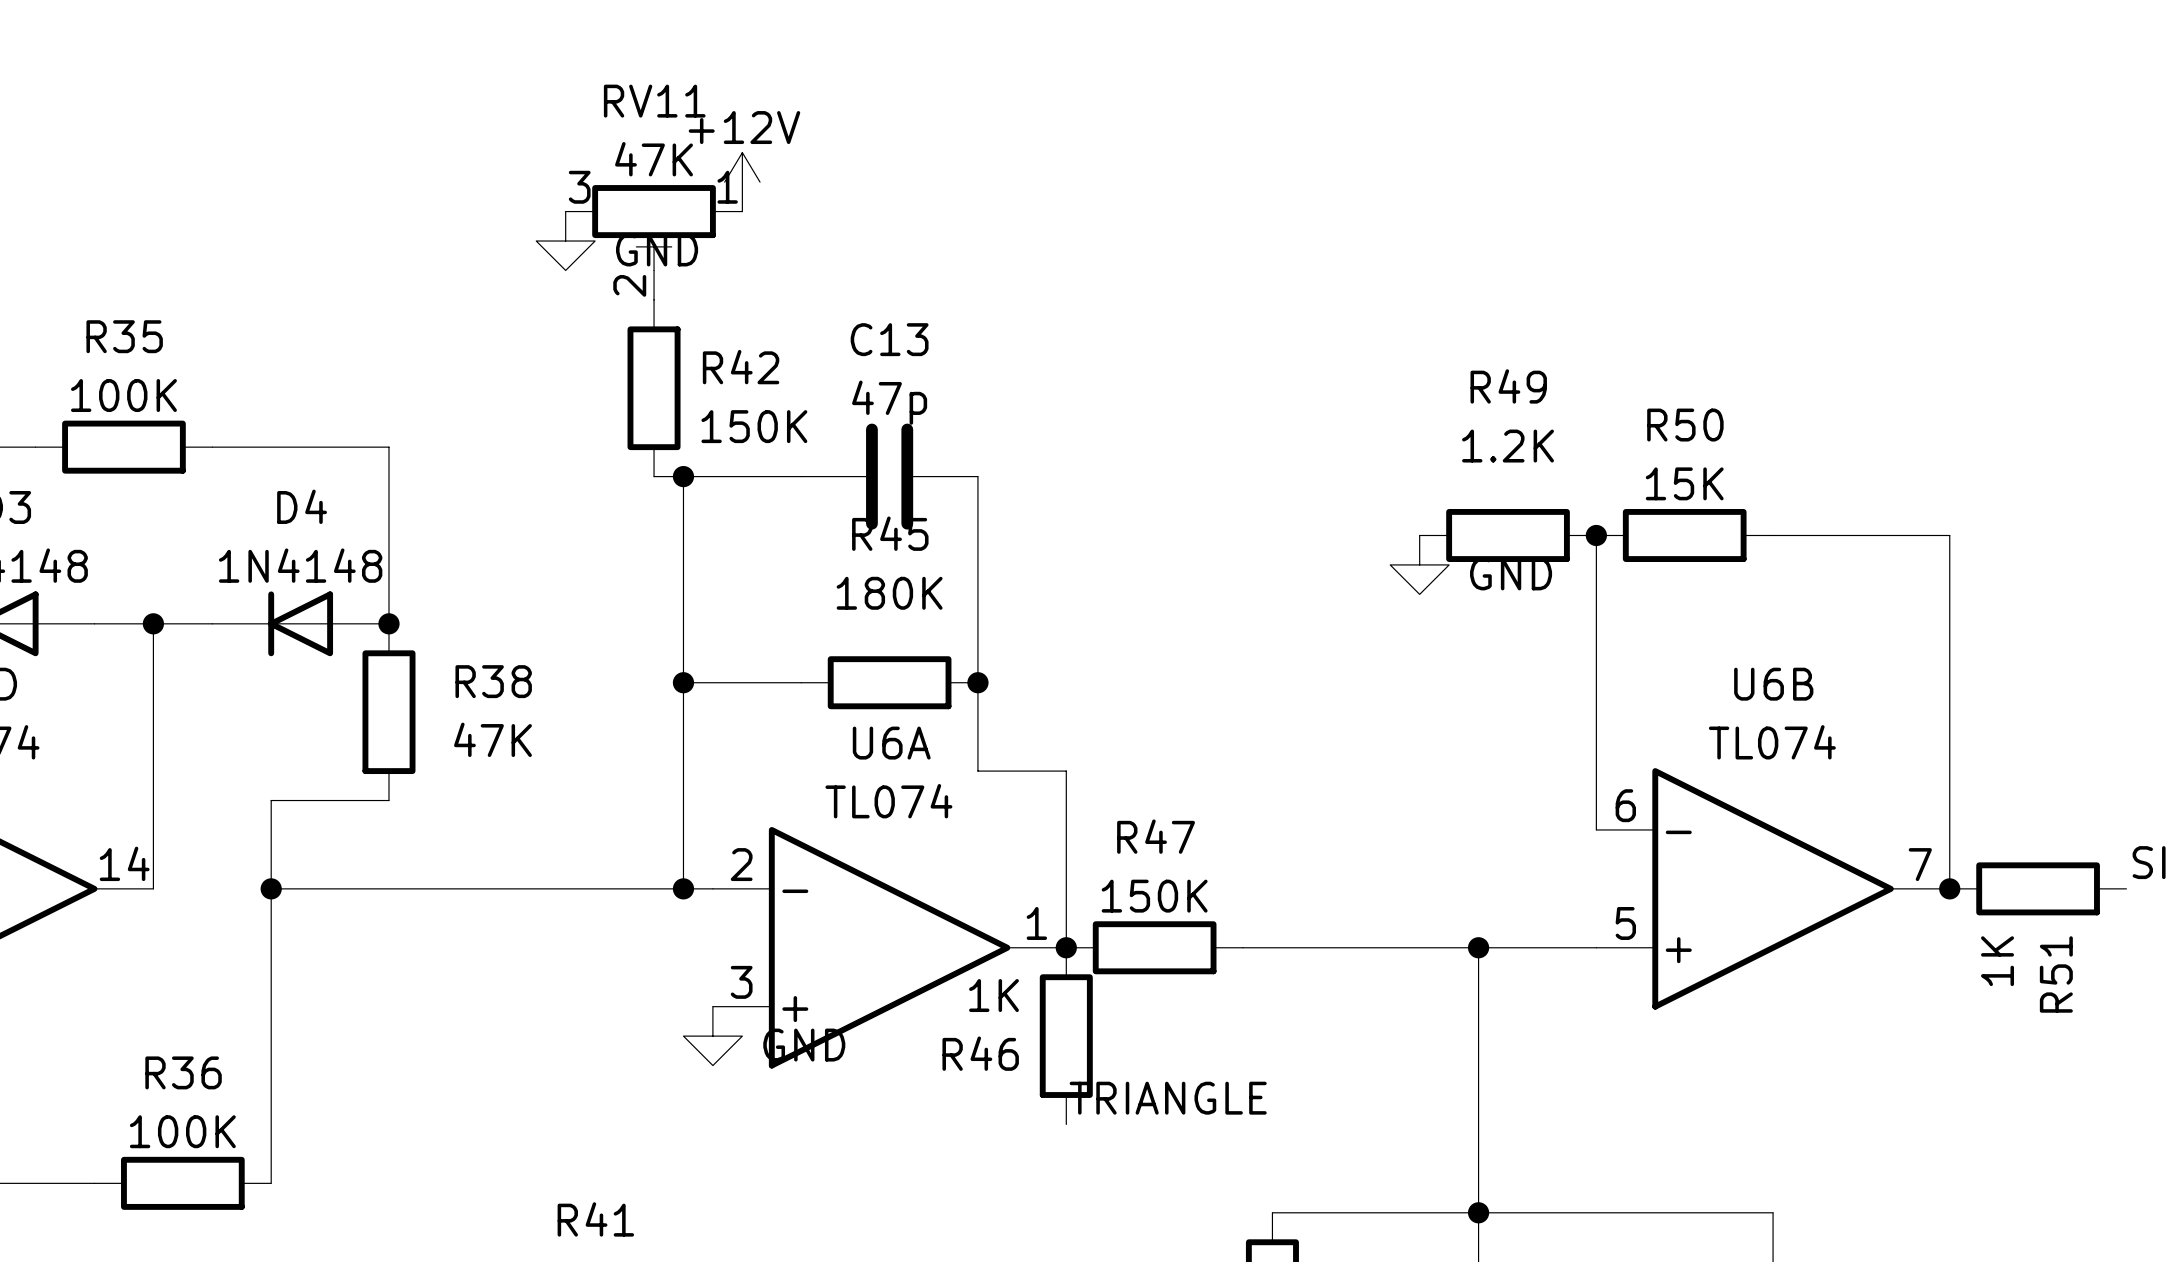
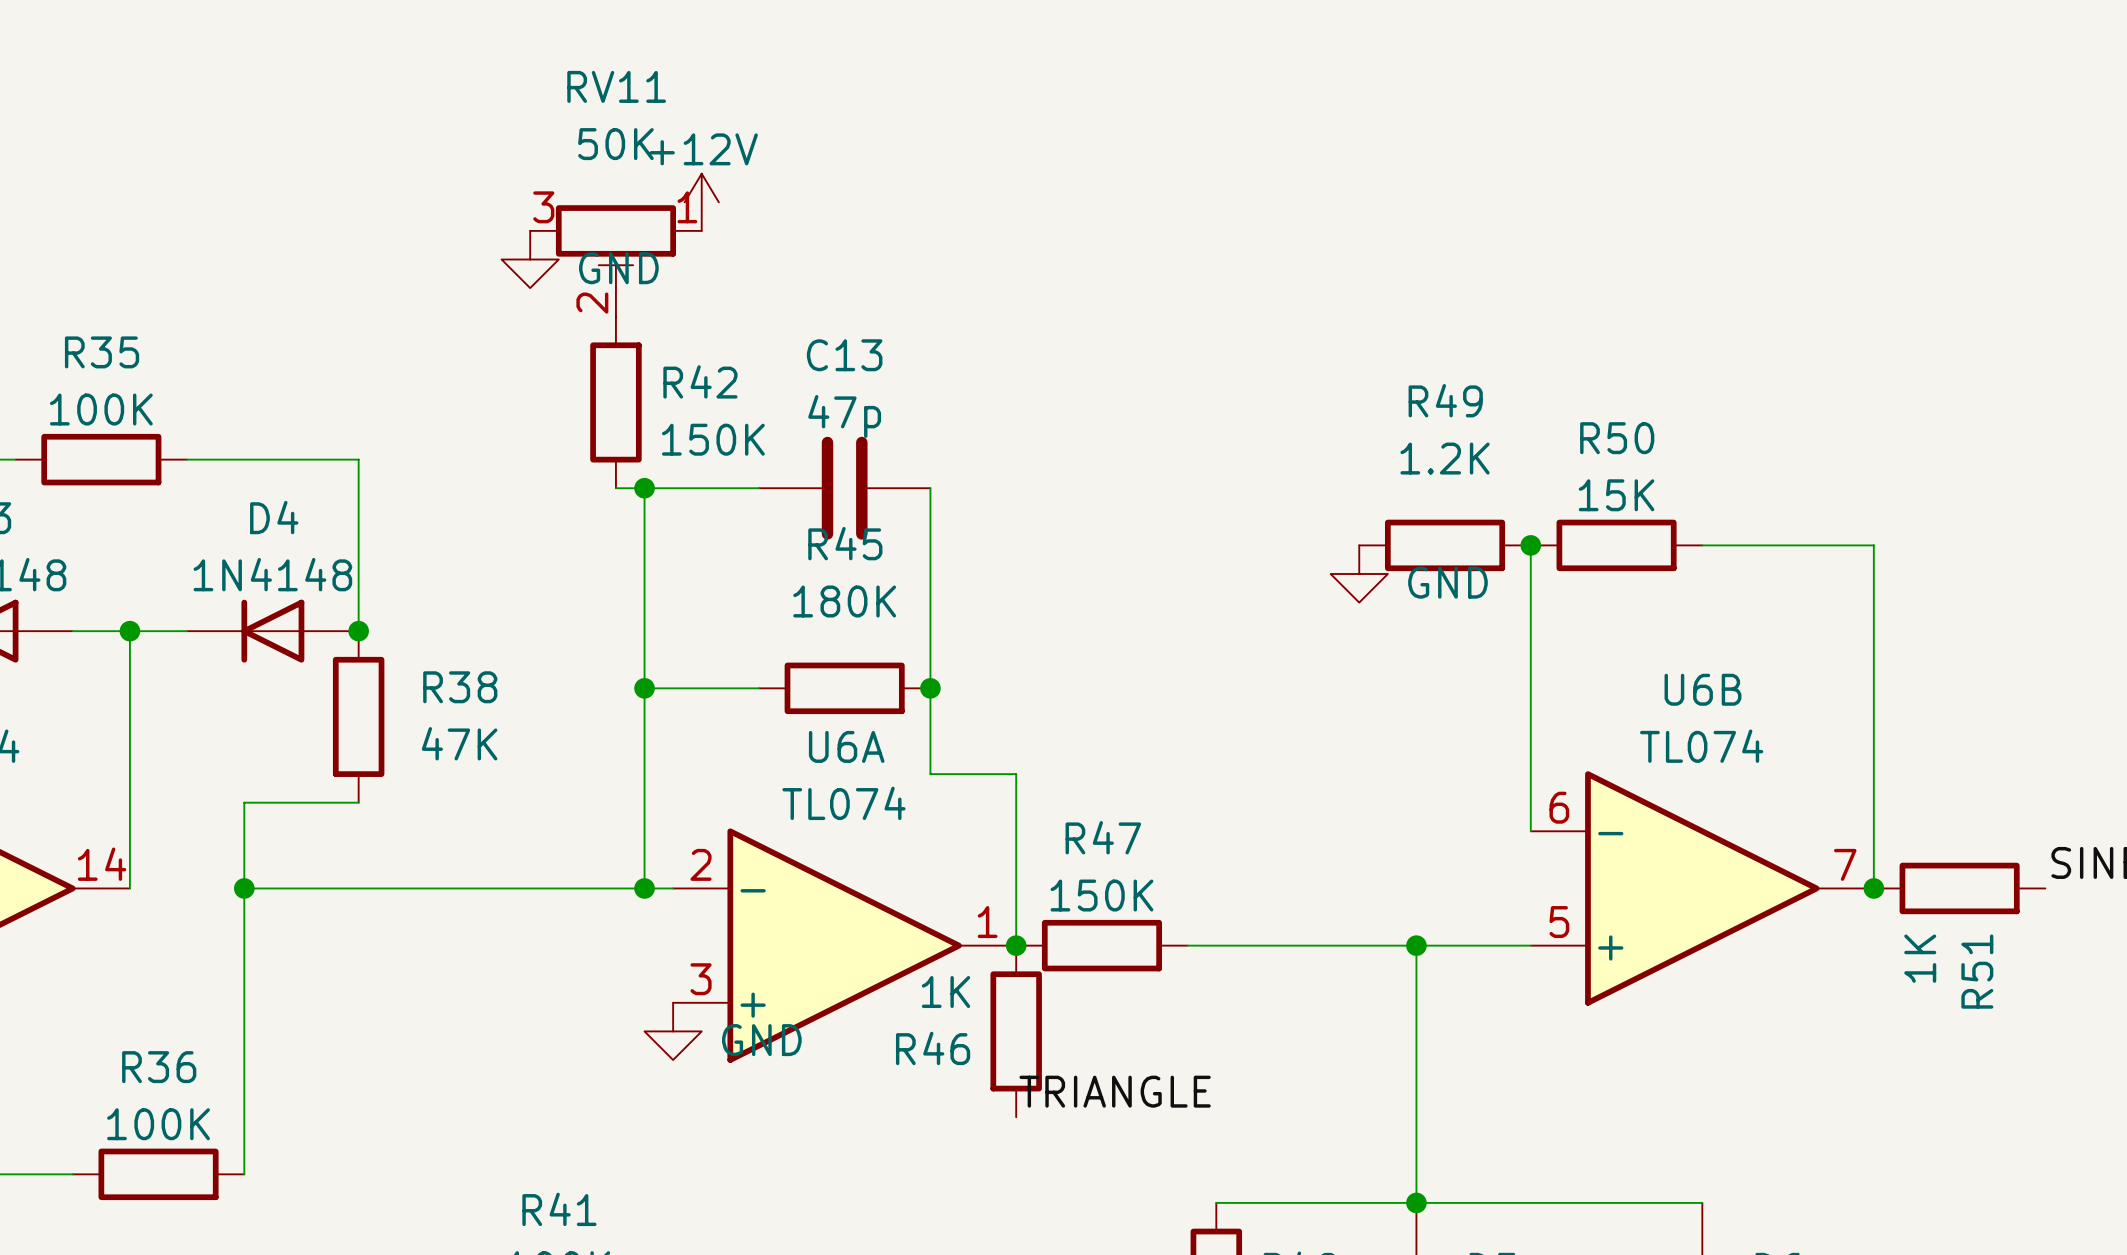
RV11 name position: RV11 (654, 101) -> RV11 (616, 86)
RV11 value: 47K (654, 159) -> 50K (615, 144)

